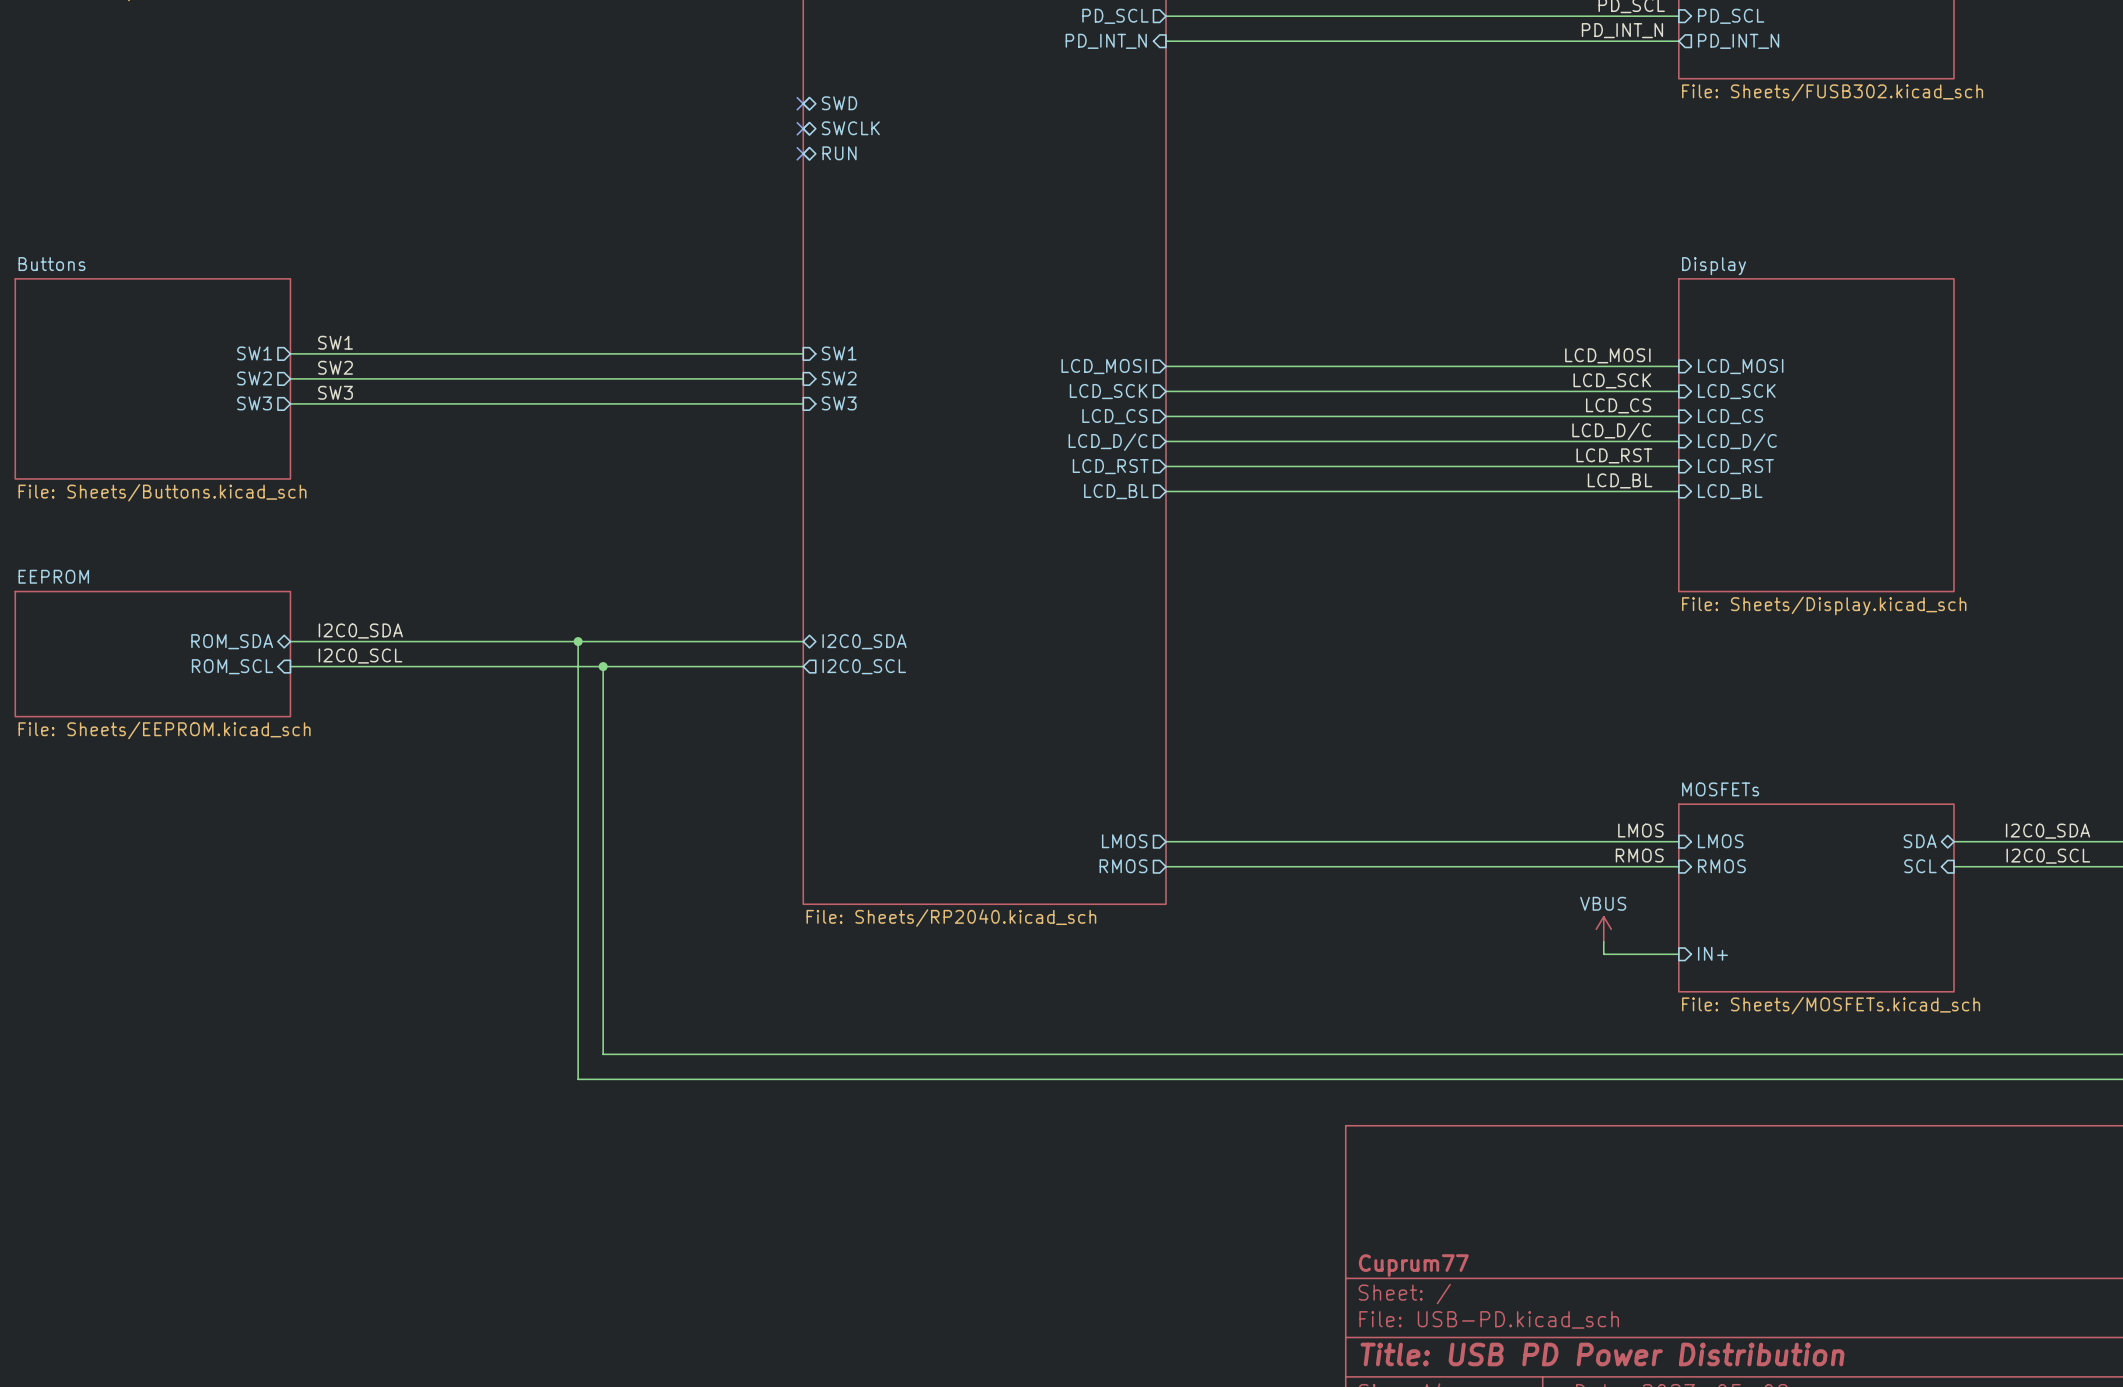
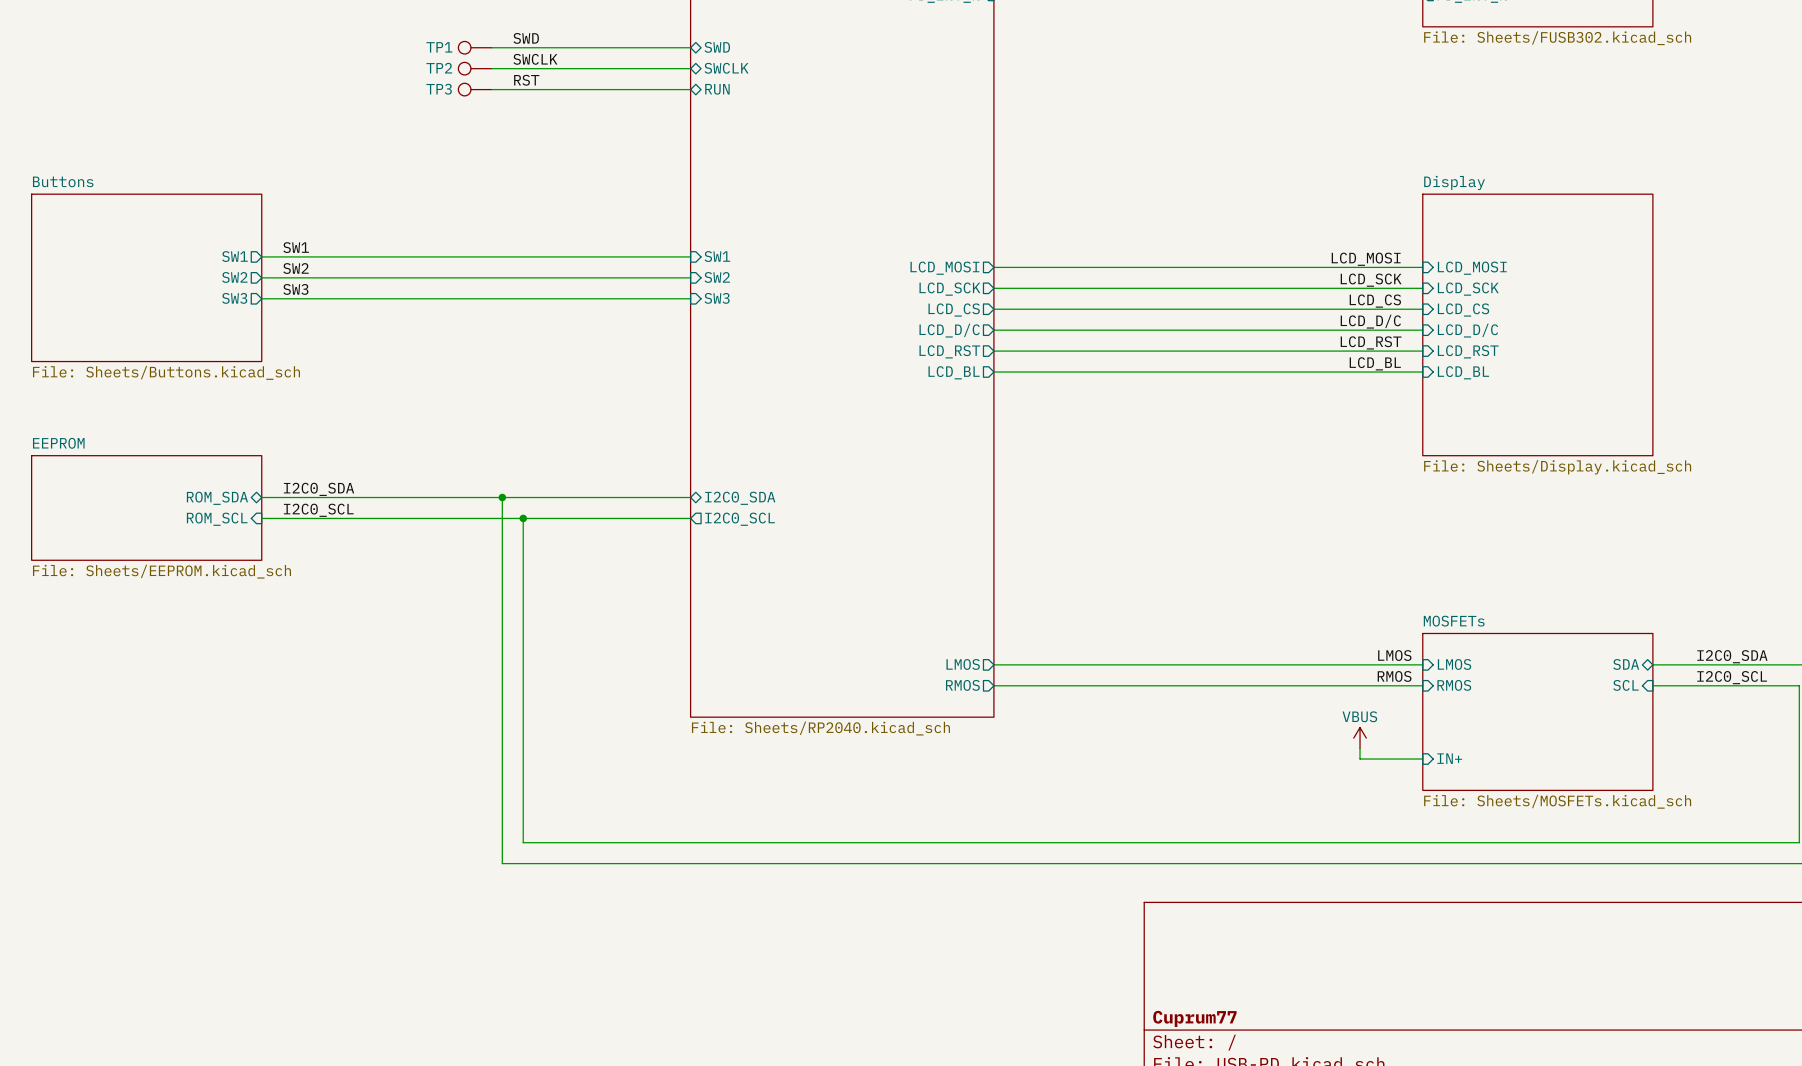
label: none -> SWD (526, 38)
TP1: none -> (475, 47)
wire: none -> (491, 47) (690, 47)
no-connect mark: (803, 103) -> none
label: none -> SWCLK (535, 59)
TP2: none -> (475, 68)
wire: none -> (491, 68) (690, 68)
no-connect mark: (803, 128) -> none
label: none -> RST (526, 80)
TP3: none -> (475, 89)
wire: none -> (491, 89) (690, 89)
no-connect mark: (803, 153) -> none

